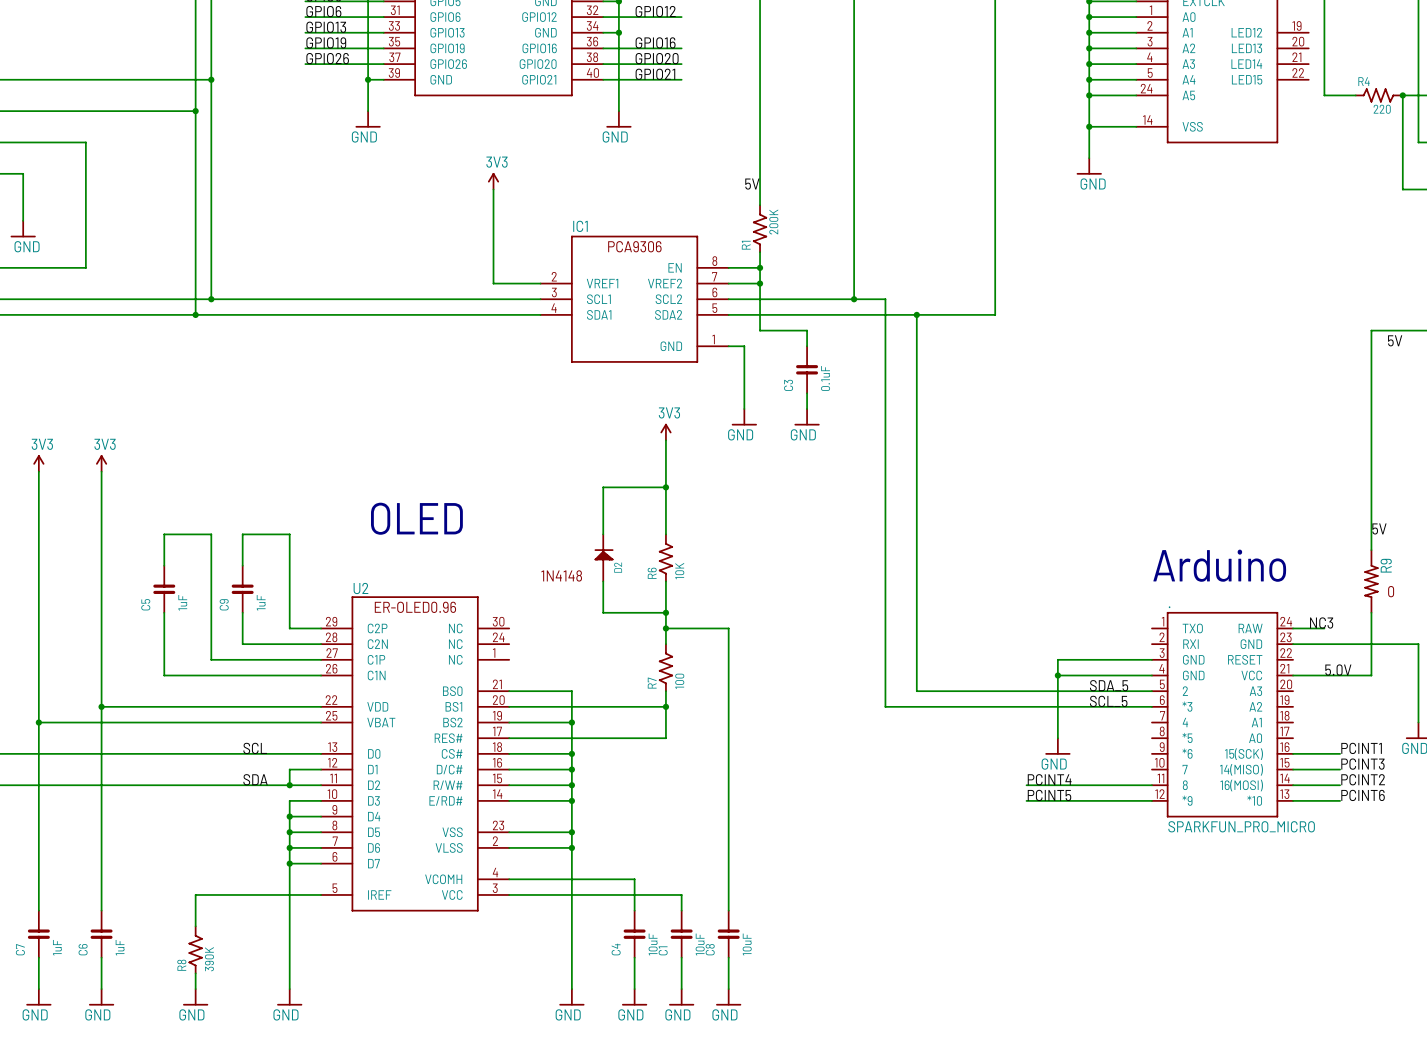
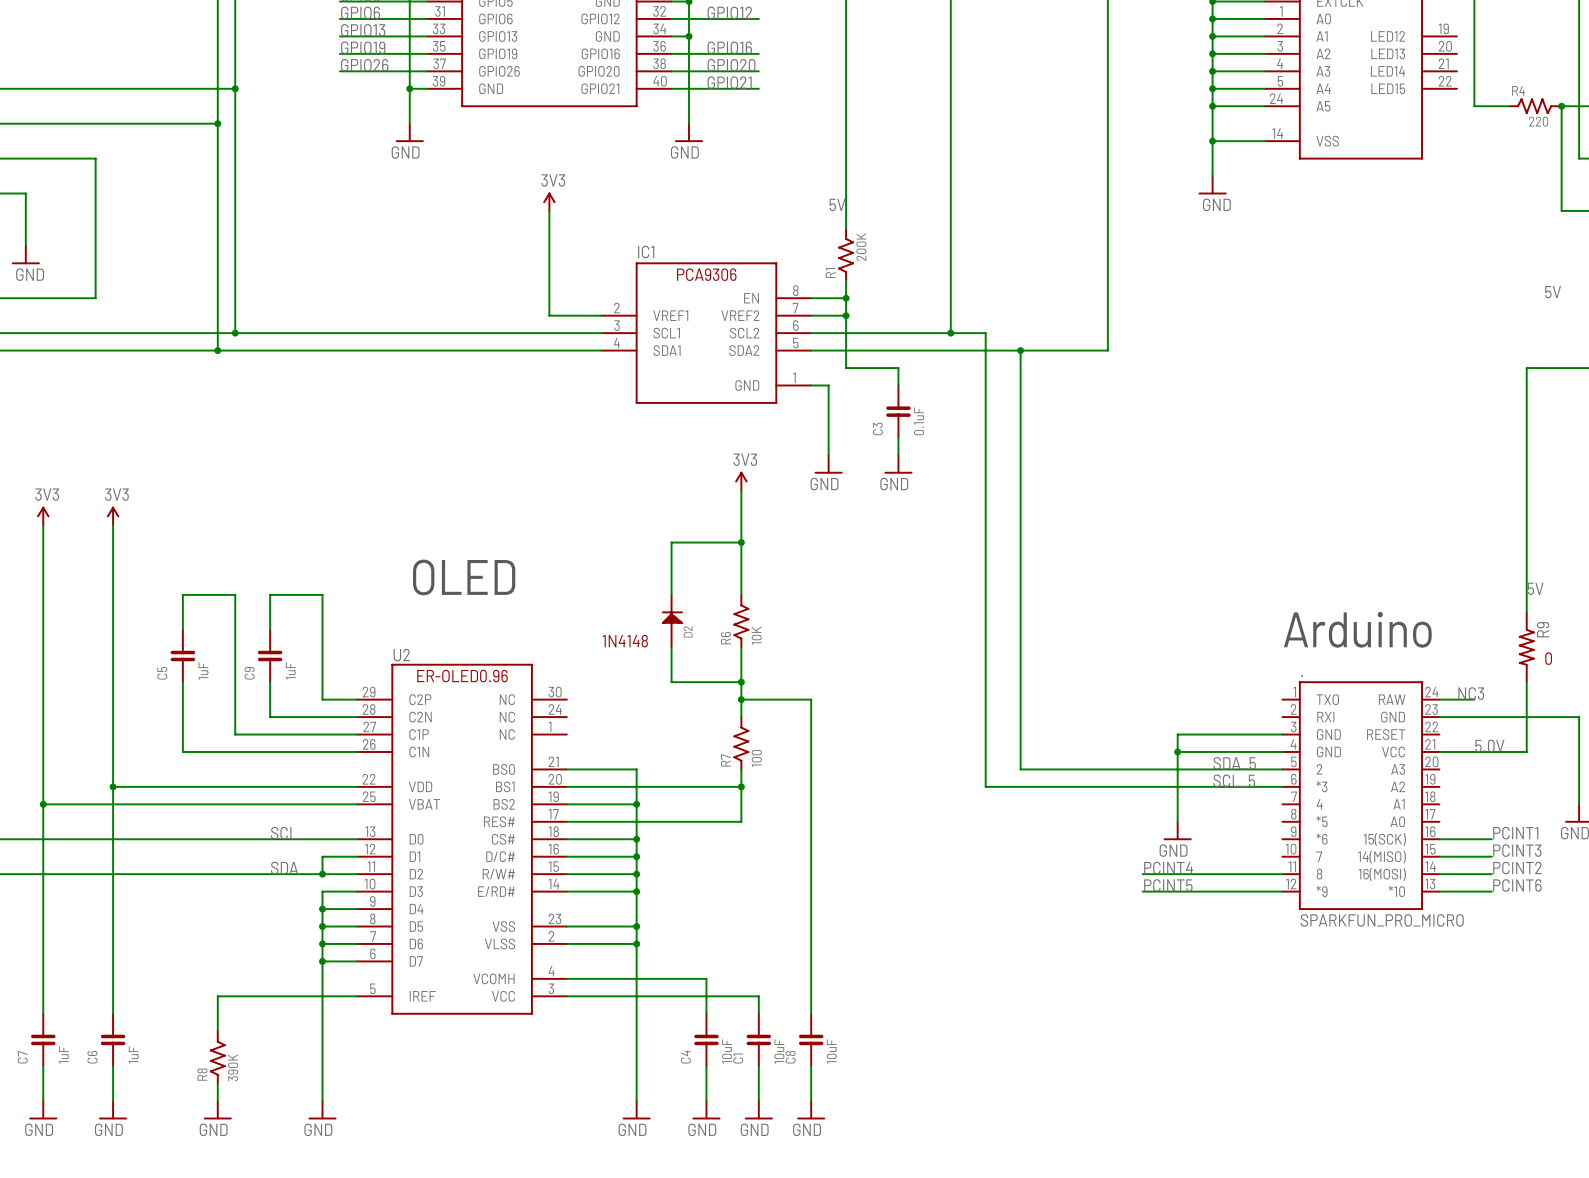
label position: 5V (1395, 340) -> 5V (1553, 292)

